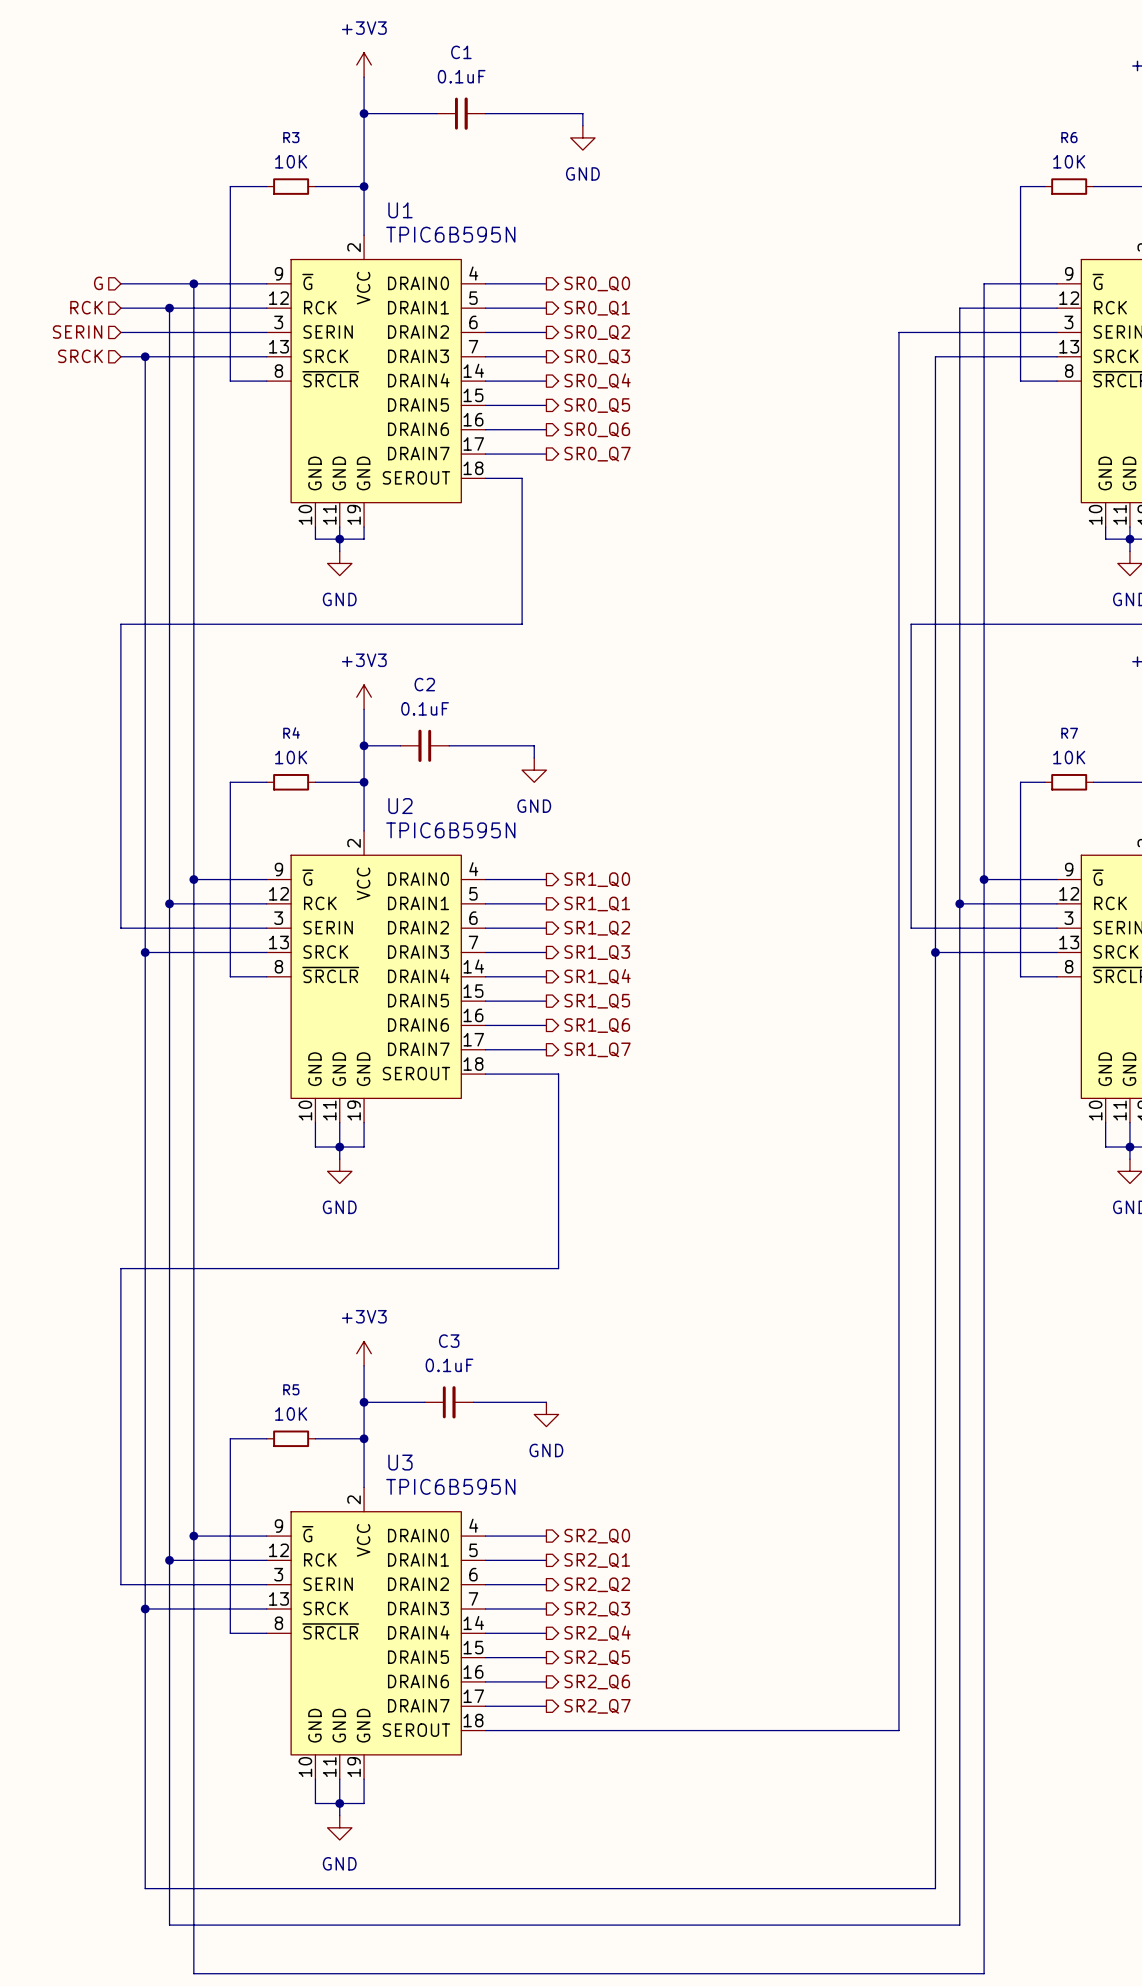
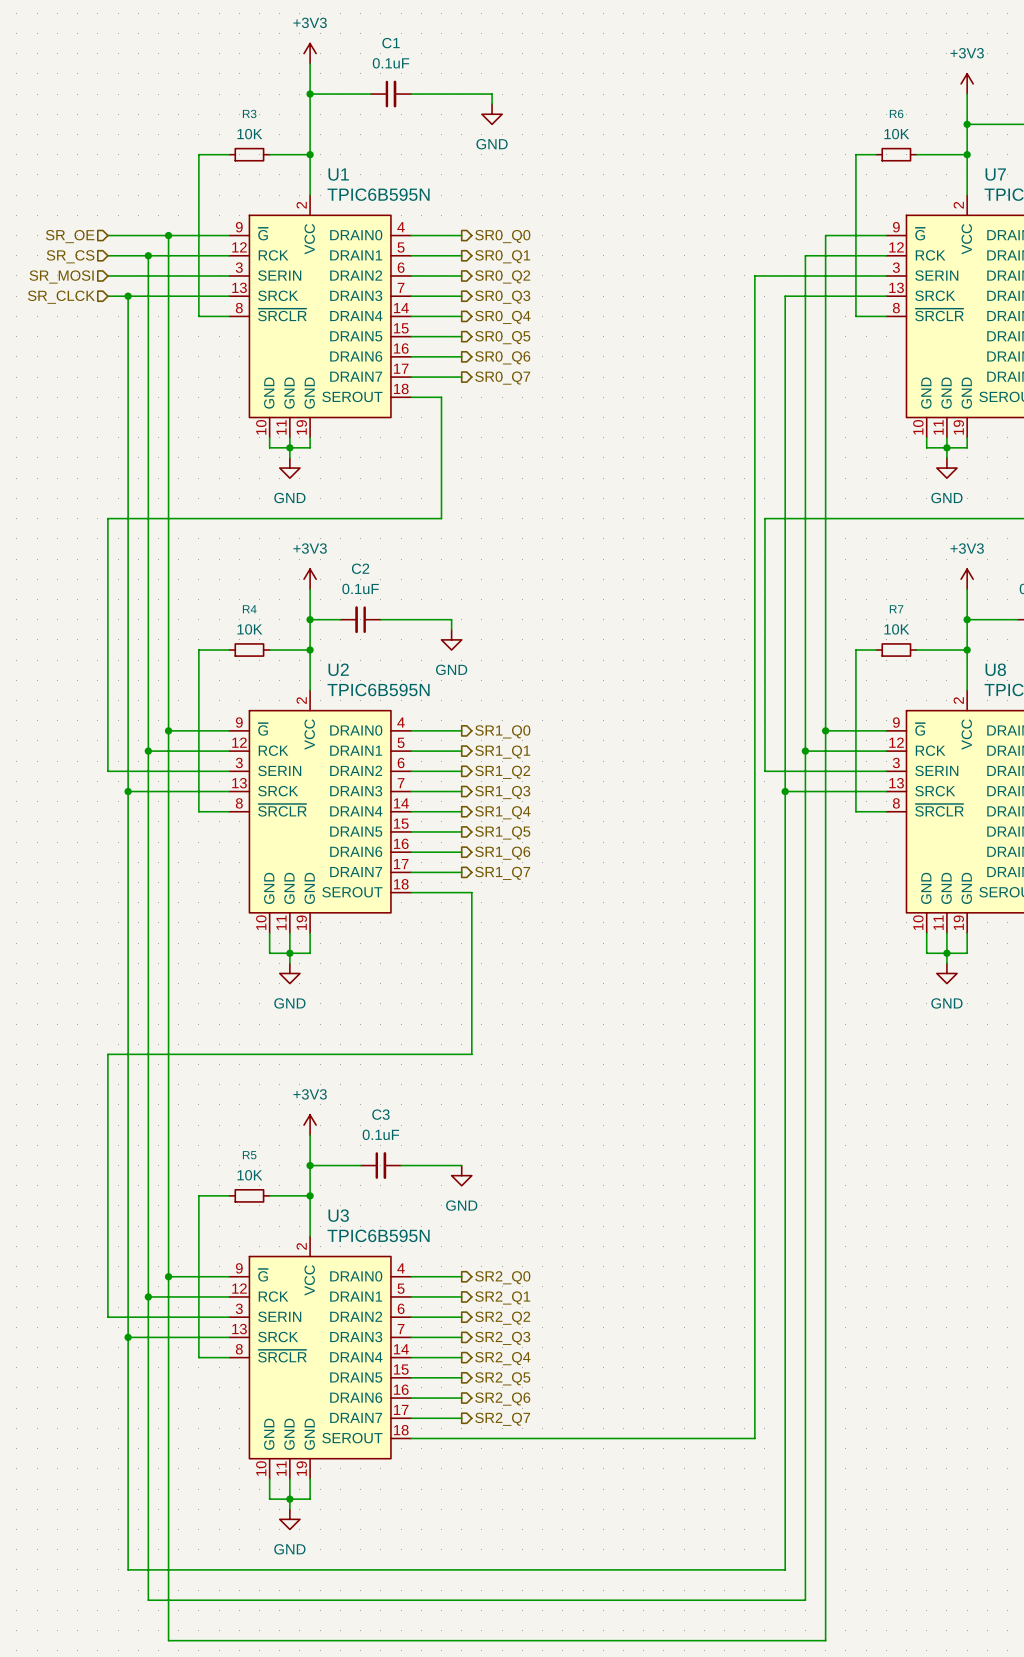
hierarchical label: G (98, 283) -> SR_OE (70, 236)
hierarchical label: RCK (86, 307) -> SR_CS (70, 256)
hierarchical label: SERIN (77, 332) -> SR_MOSI (61, 276)
hierarchical label: SRCK (80, 356) -> SR_CLCK (61, 297)

